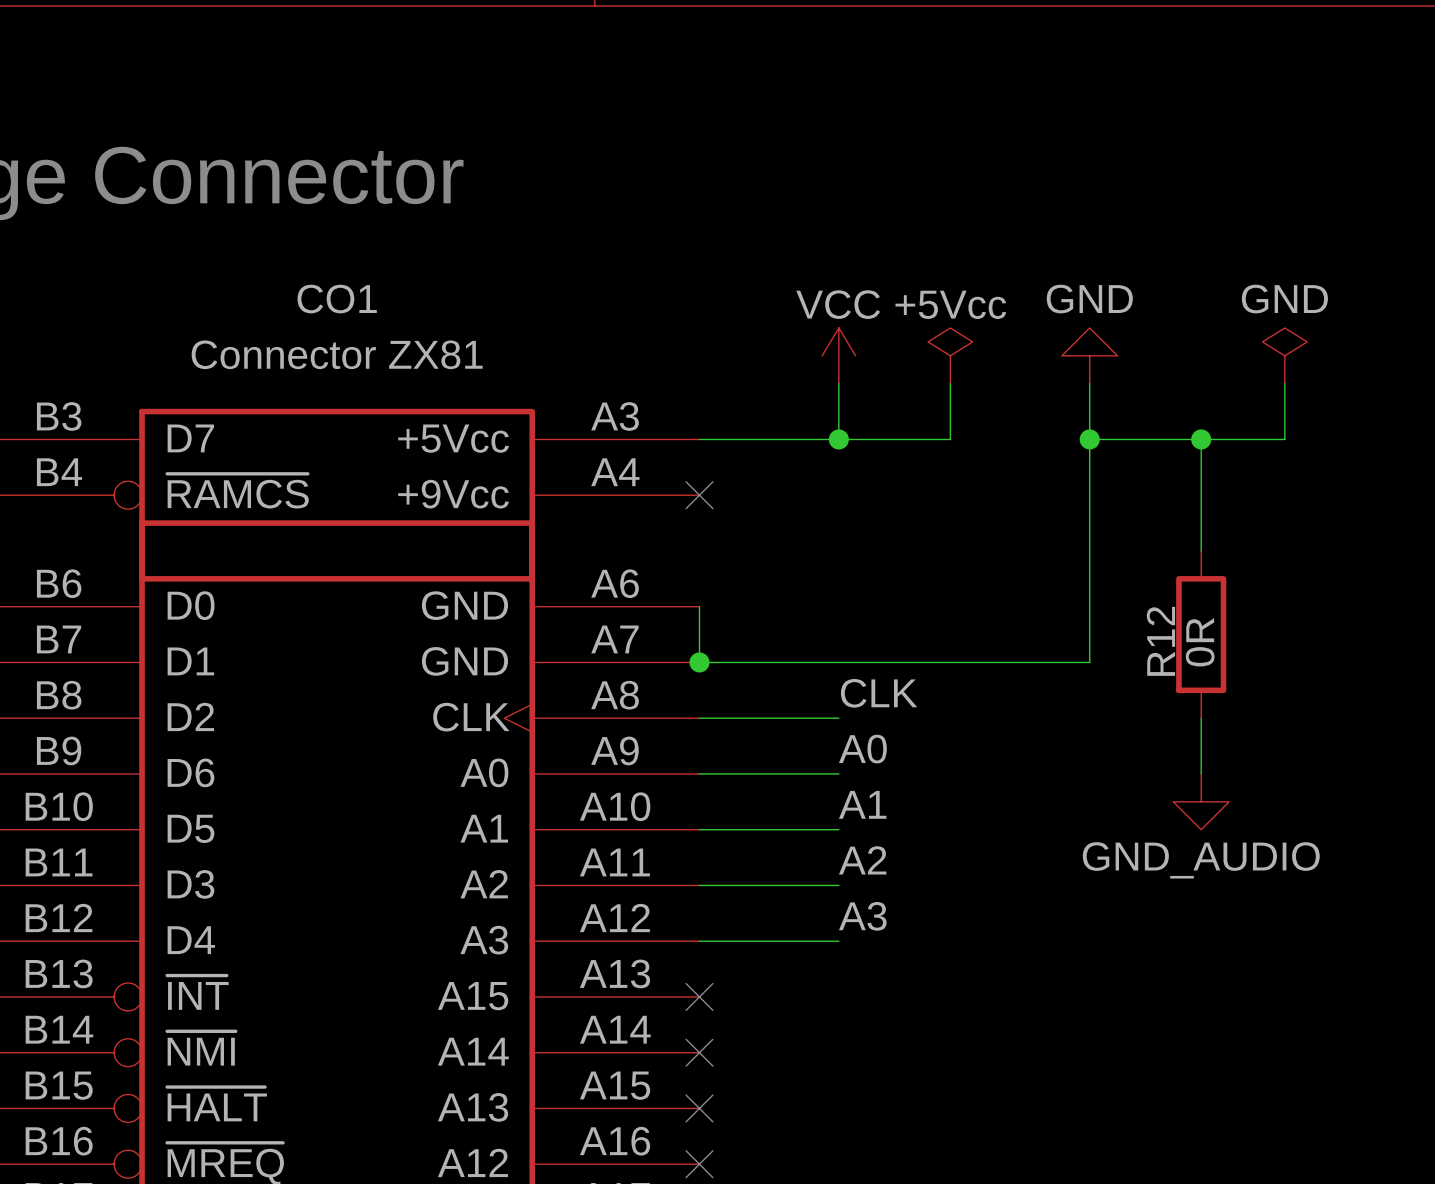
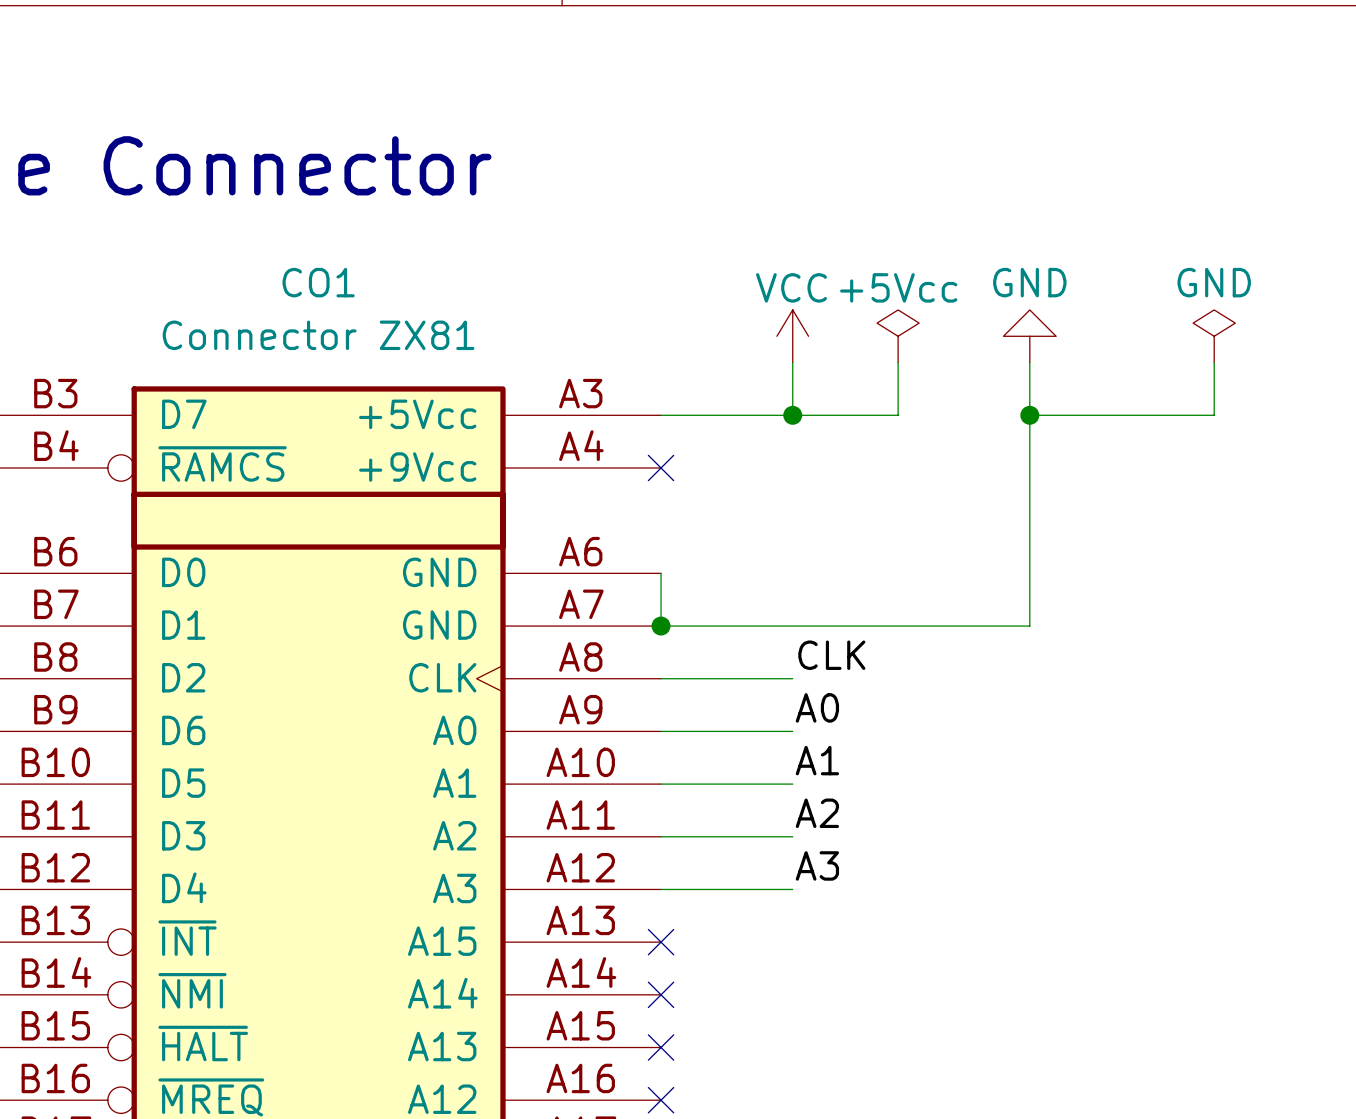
wire: (1201, 439) (1201, 550) -> none
junction: (1201, 439) -> none
R12: 0R (1201, 634) -> none
wire: (1201, 718) (1201, 773) -> none
power symbol: GND_AUDIO (1201, 801) -> none

